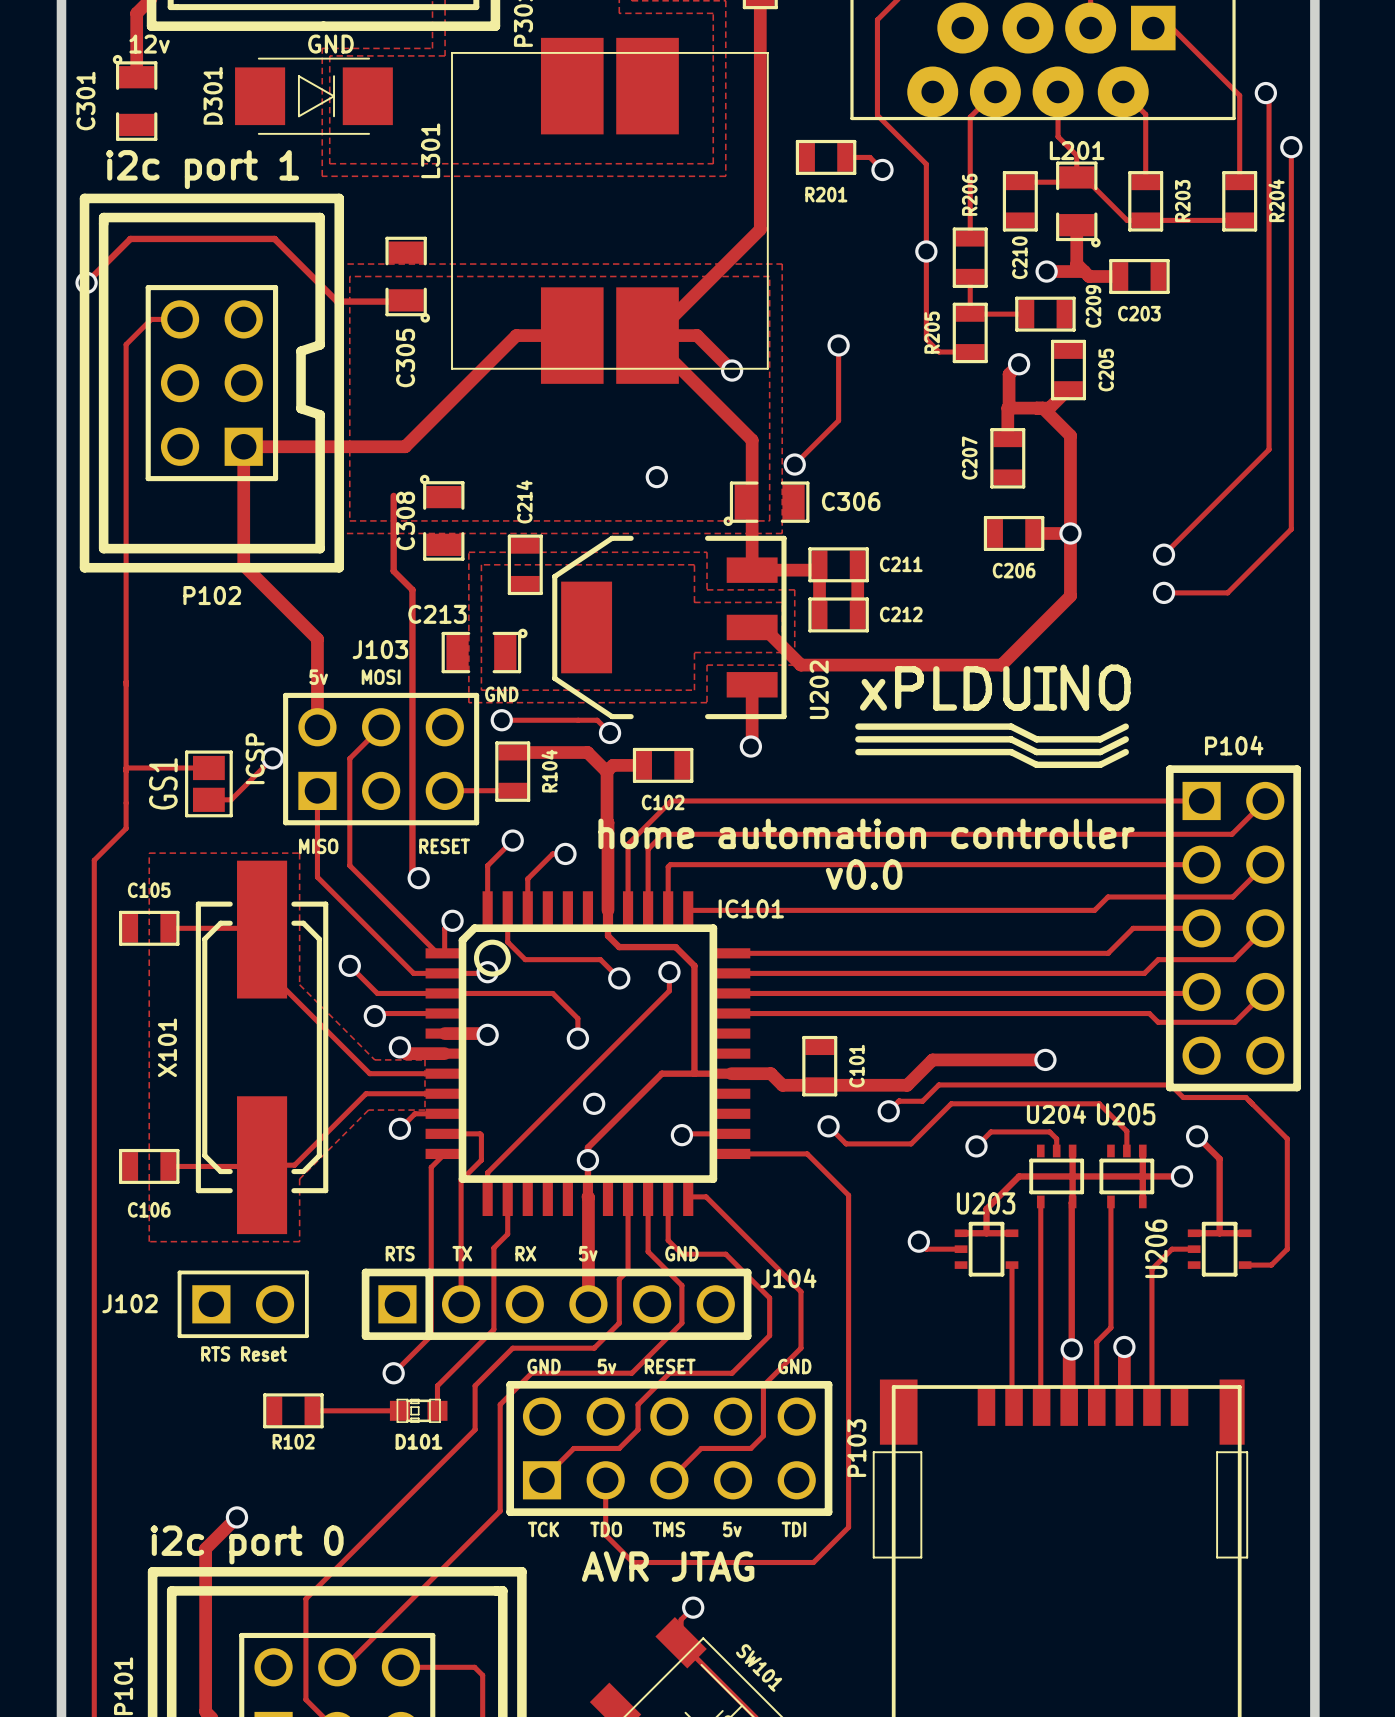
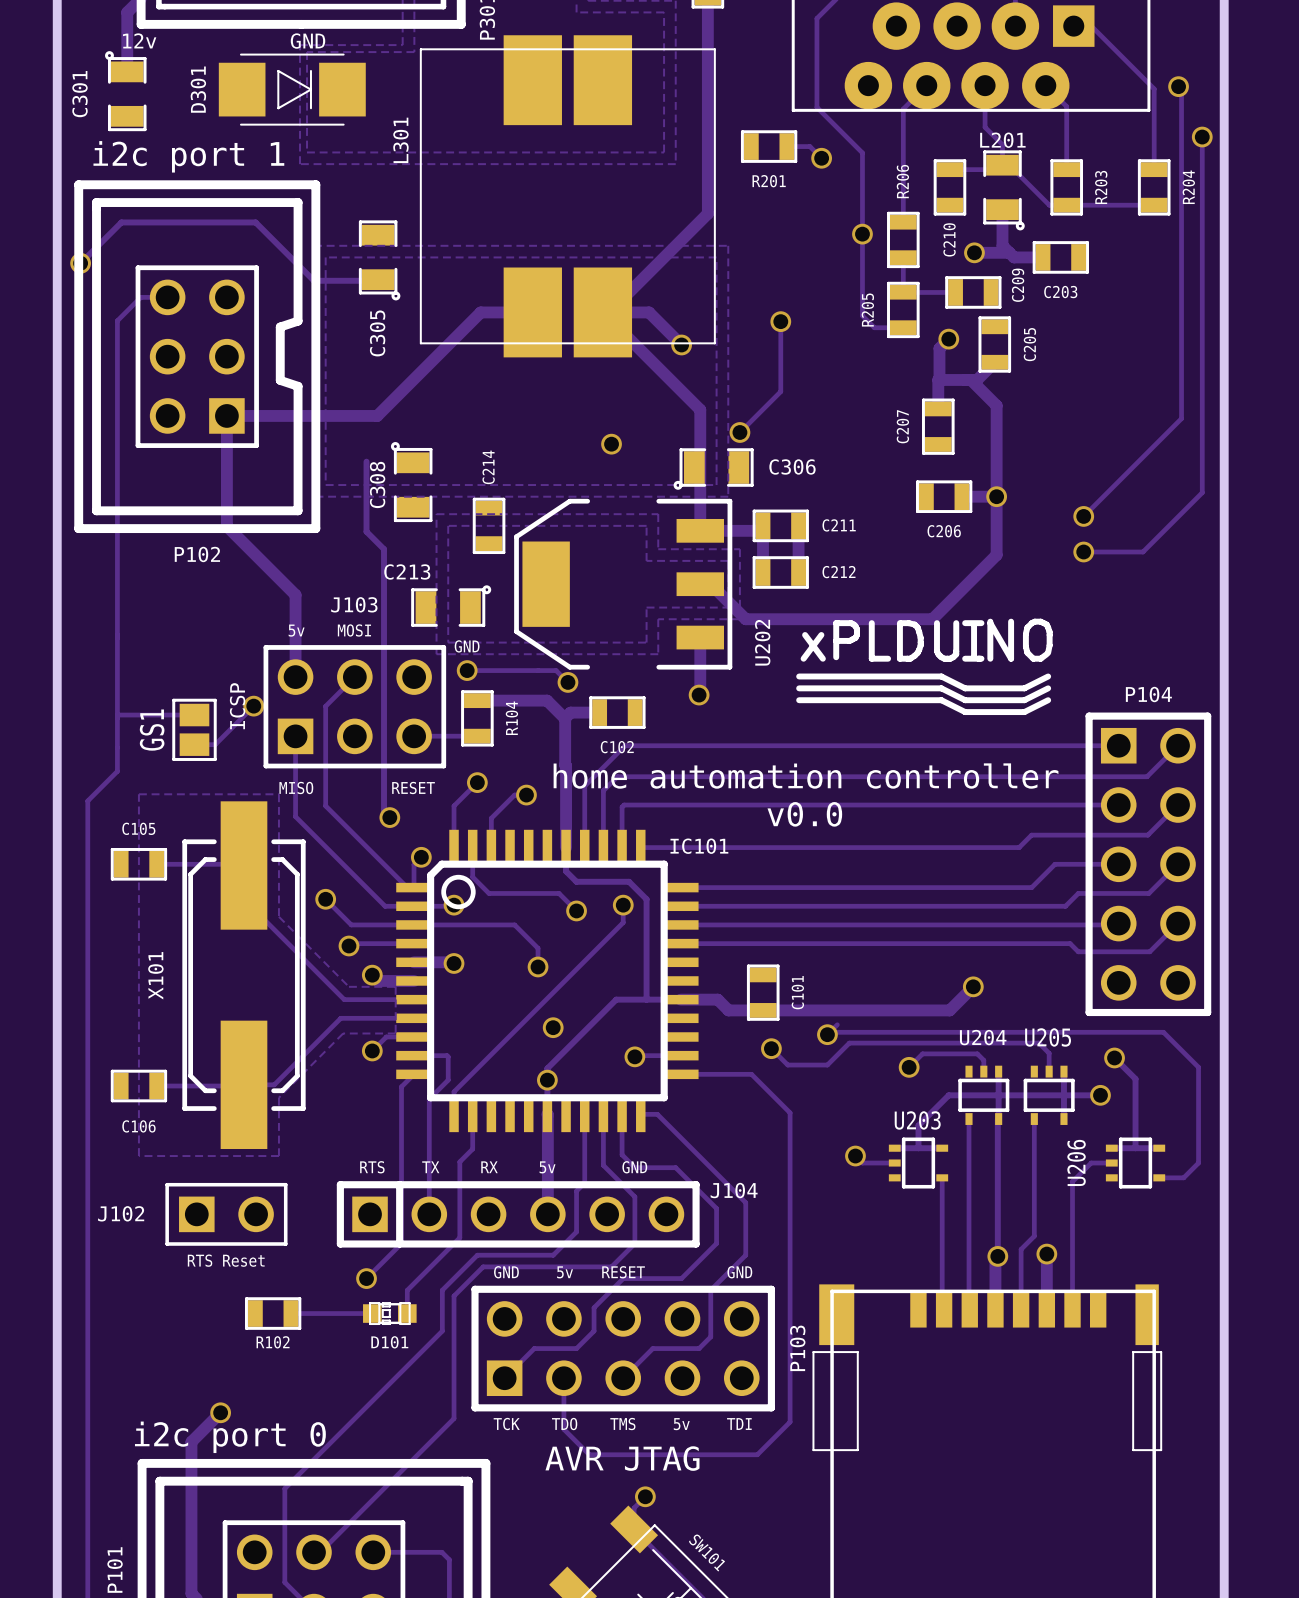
track: (1045, 1059) (932, 1059) (907, 1085) -> (973, 986) (949, 1010) (844, 1010)
track: (898, 1101) (922, 1101) (938, 1084) (1170, 1084) (1183, 1097) (1245, 1097) (1287, 1138) (1287, 1146) -> (829, 1032) (1163, 1032) (1198, 1067)
track: (1115, 1120) (1099, 1103) (951, 1103) (911, 1143) (888, 1143) -> (1038, 1043) (849, 1043) (827, 1065)
track: (681, 1323) (631, 1373) (531, 1373) (500, 1404) (500, 1511) (487, 1523) -> (634, 1231) (634, 1243) (611, 1266) (483, 1266) (454, 1296) (454, 1418)

